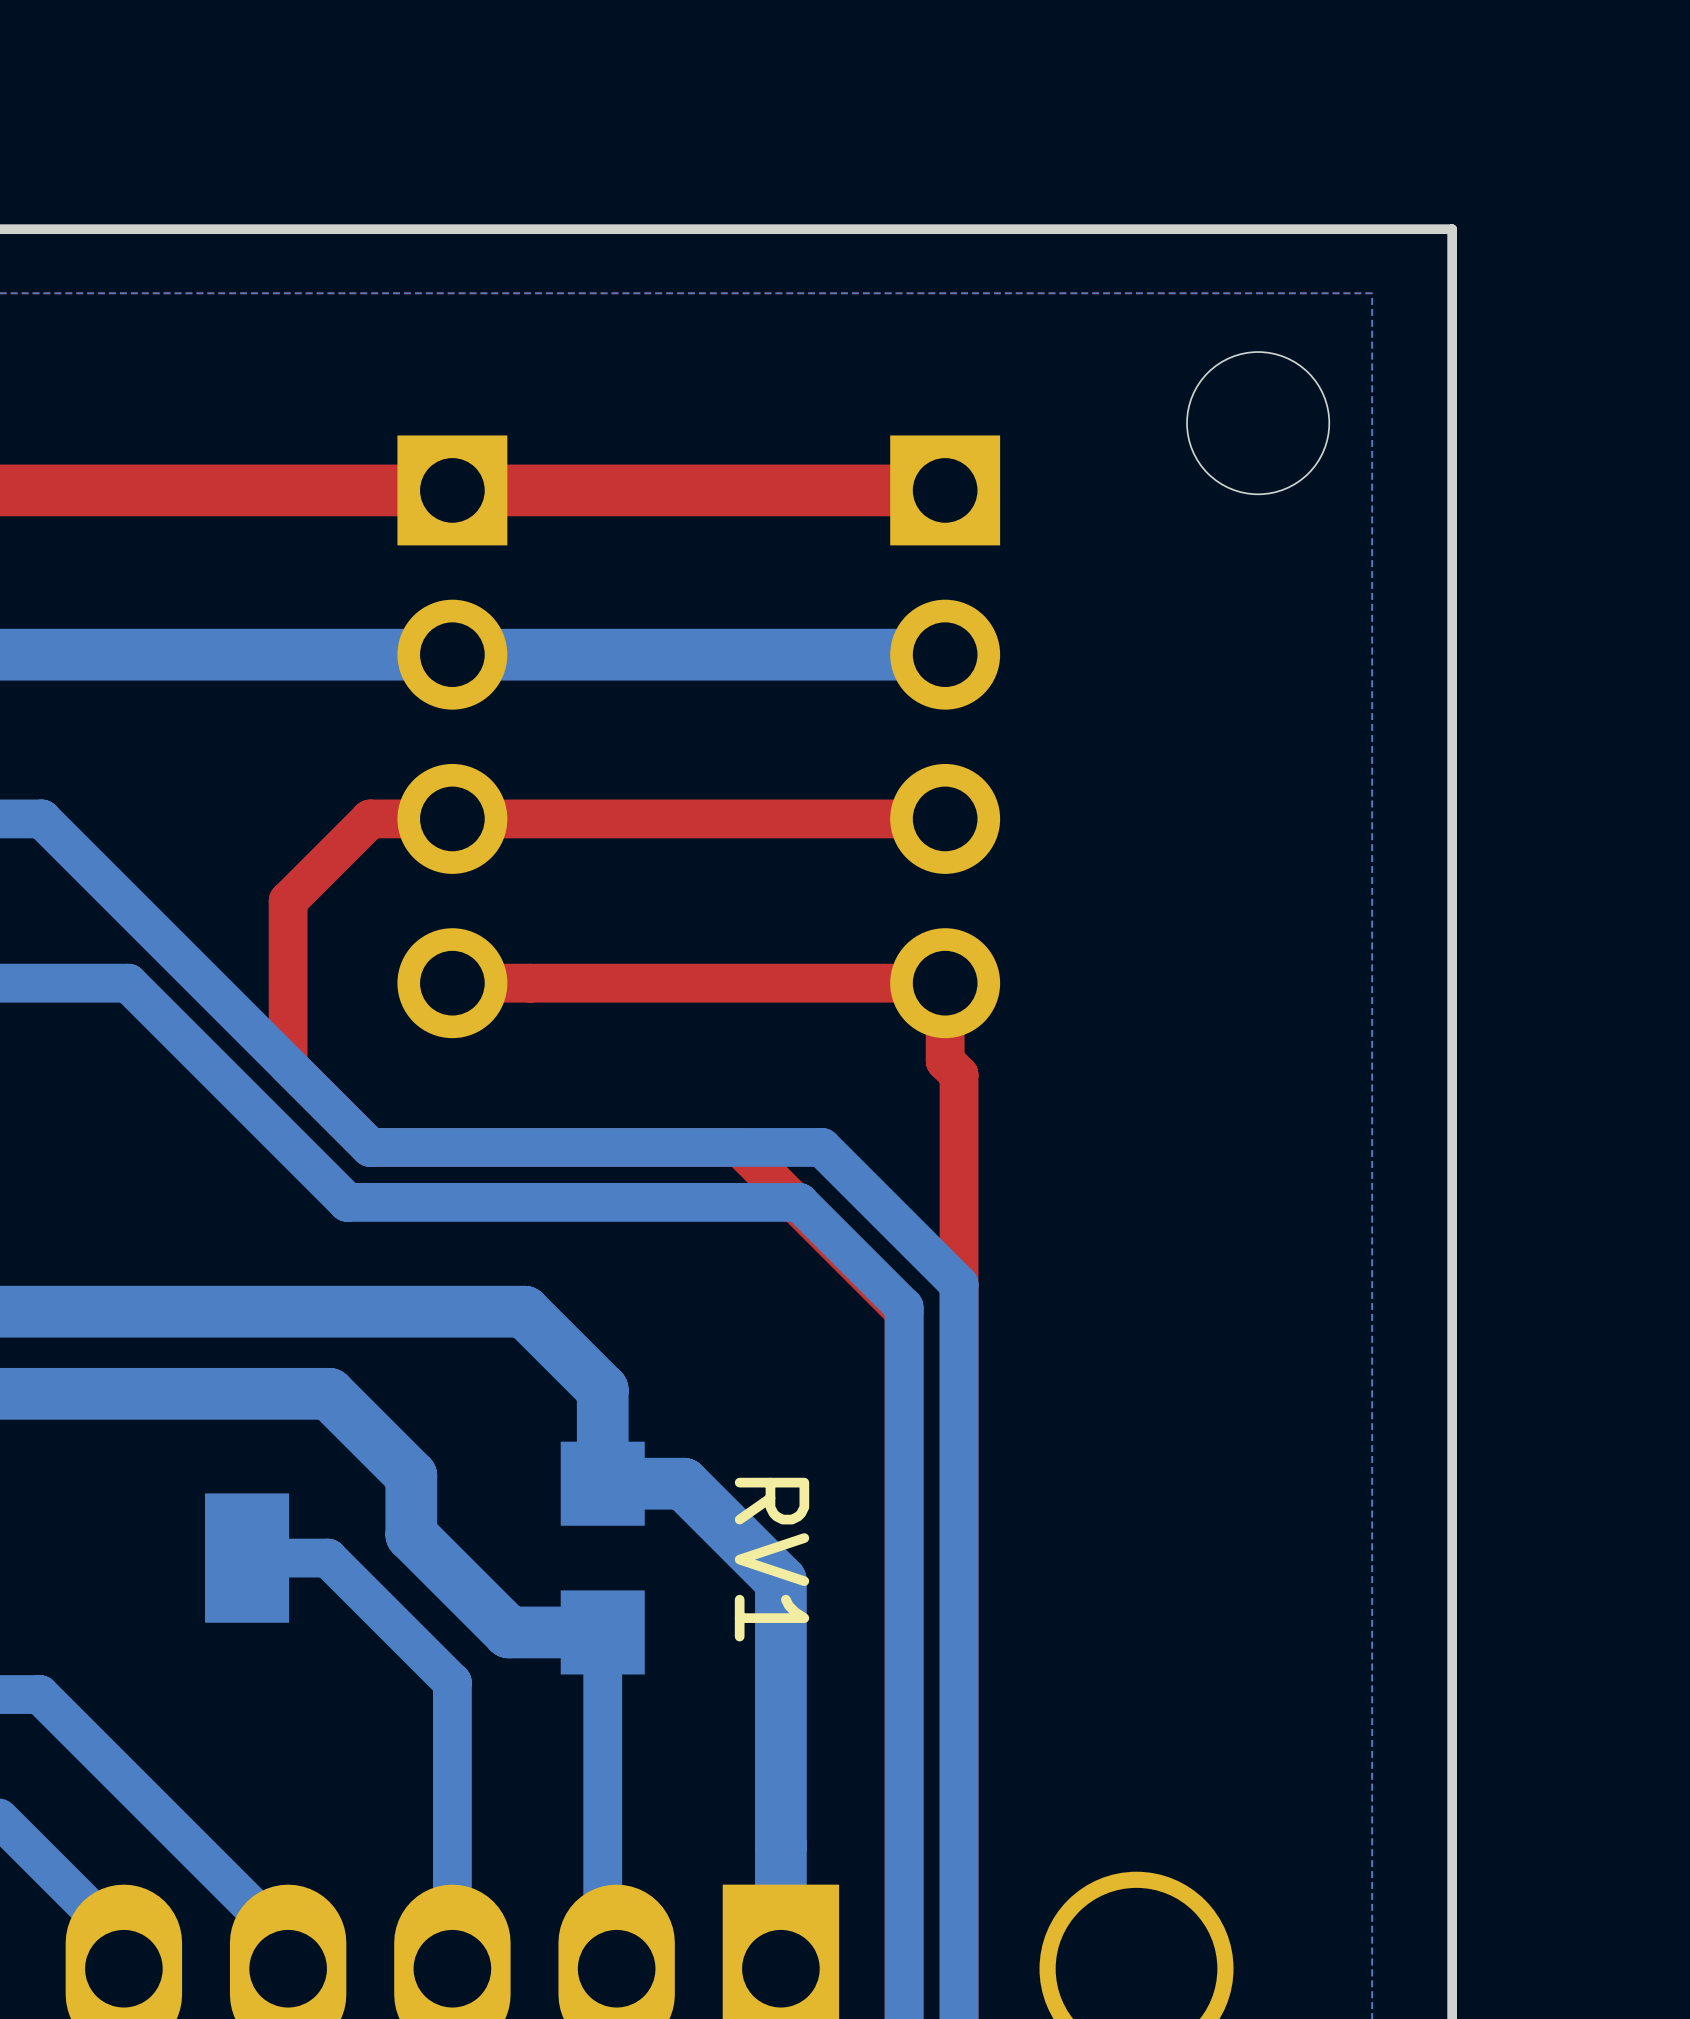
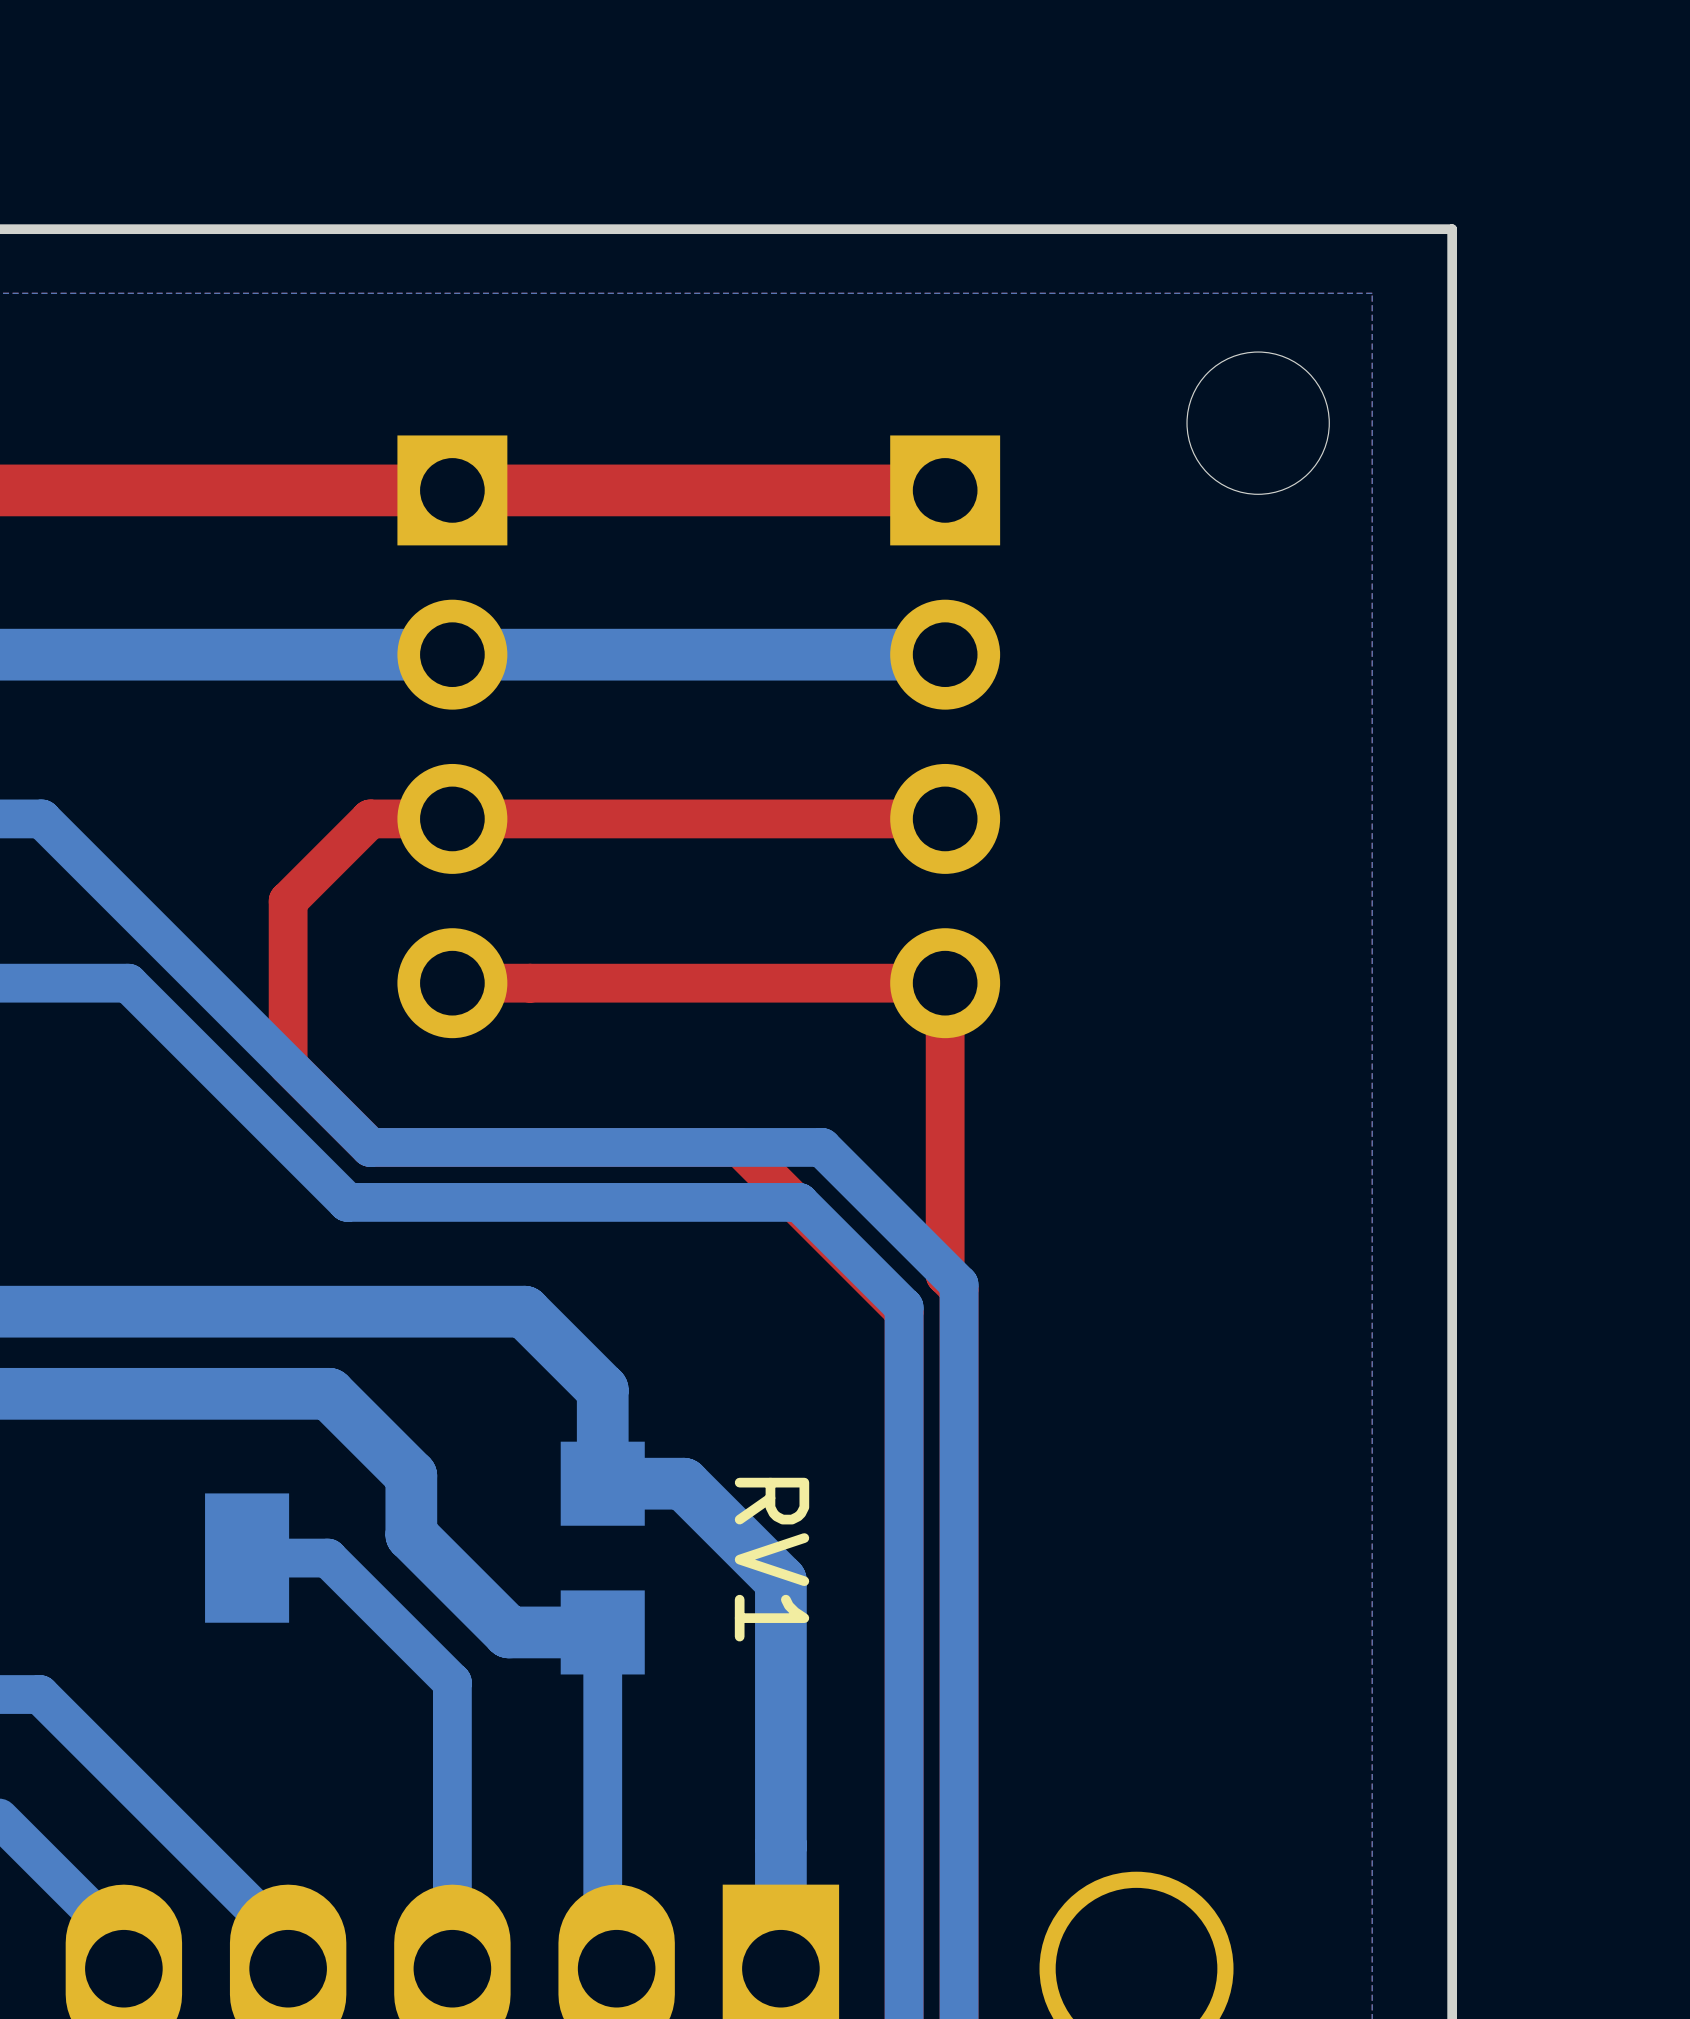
top track: (945, 1060) (959, 1074) (959, 1288) -> (945, 1060) (945, 1275) (959, 1288)

